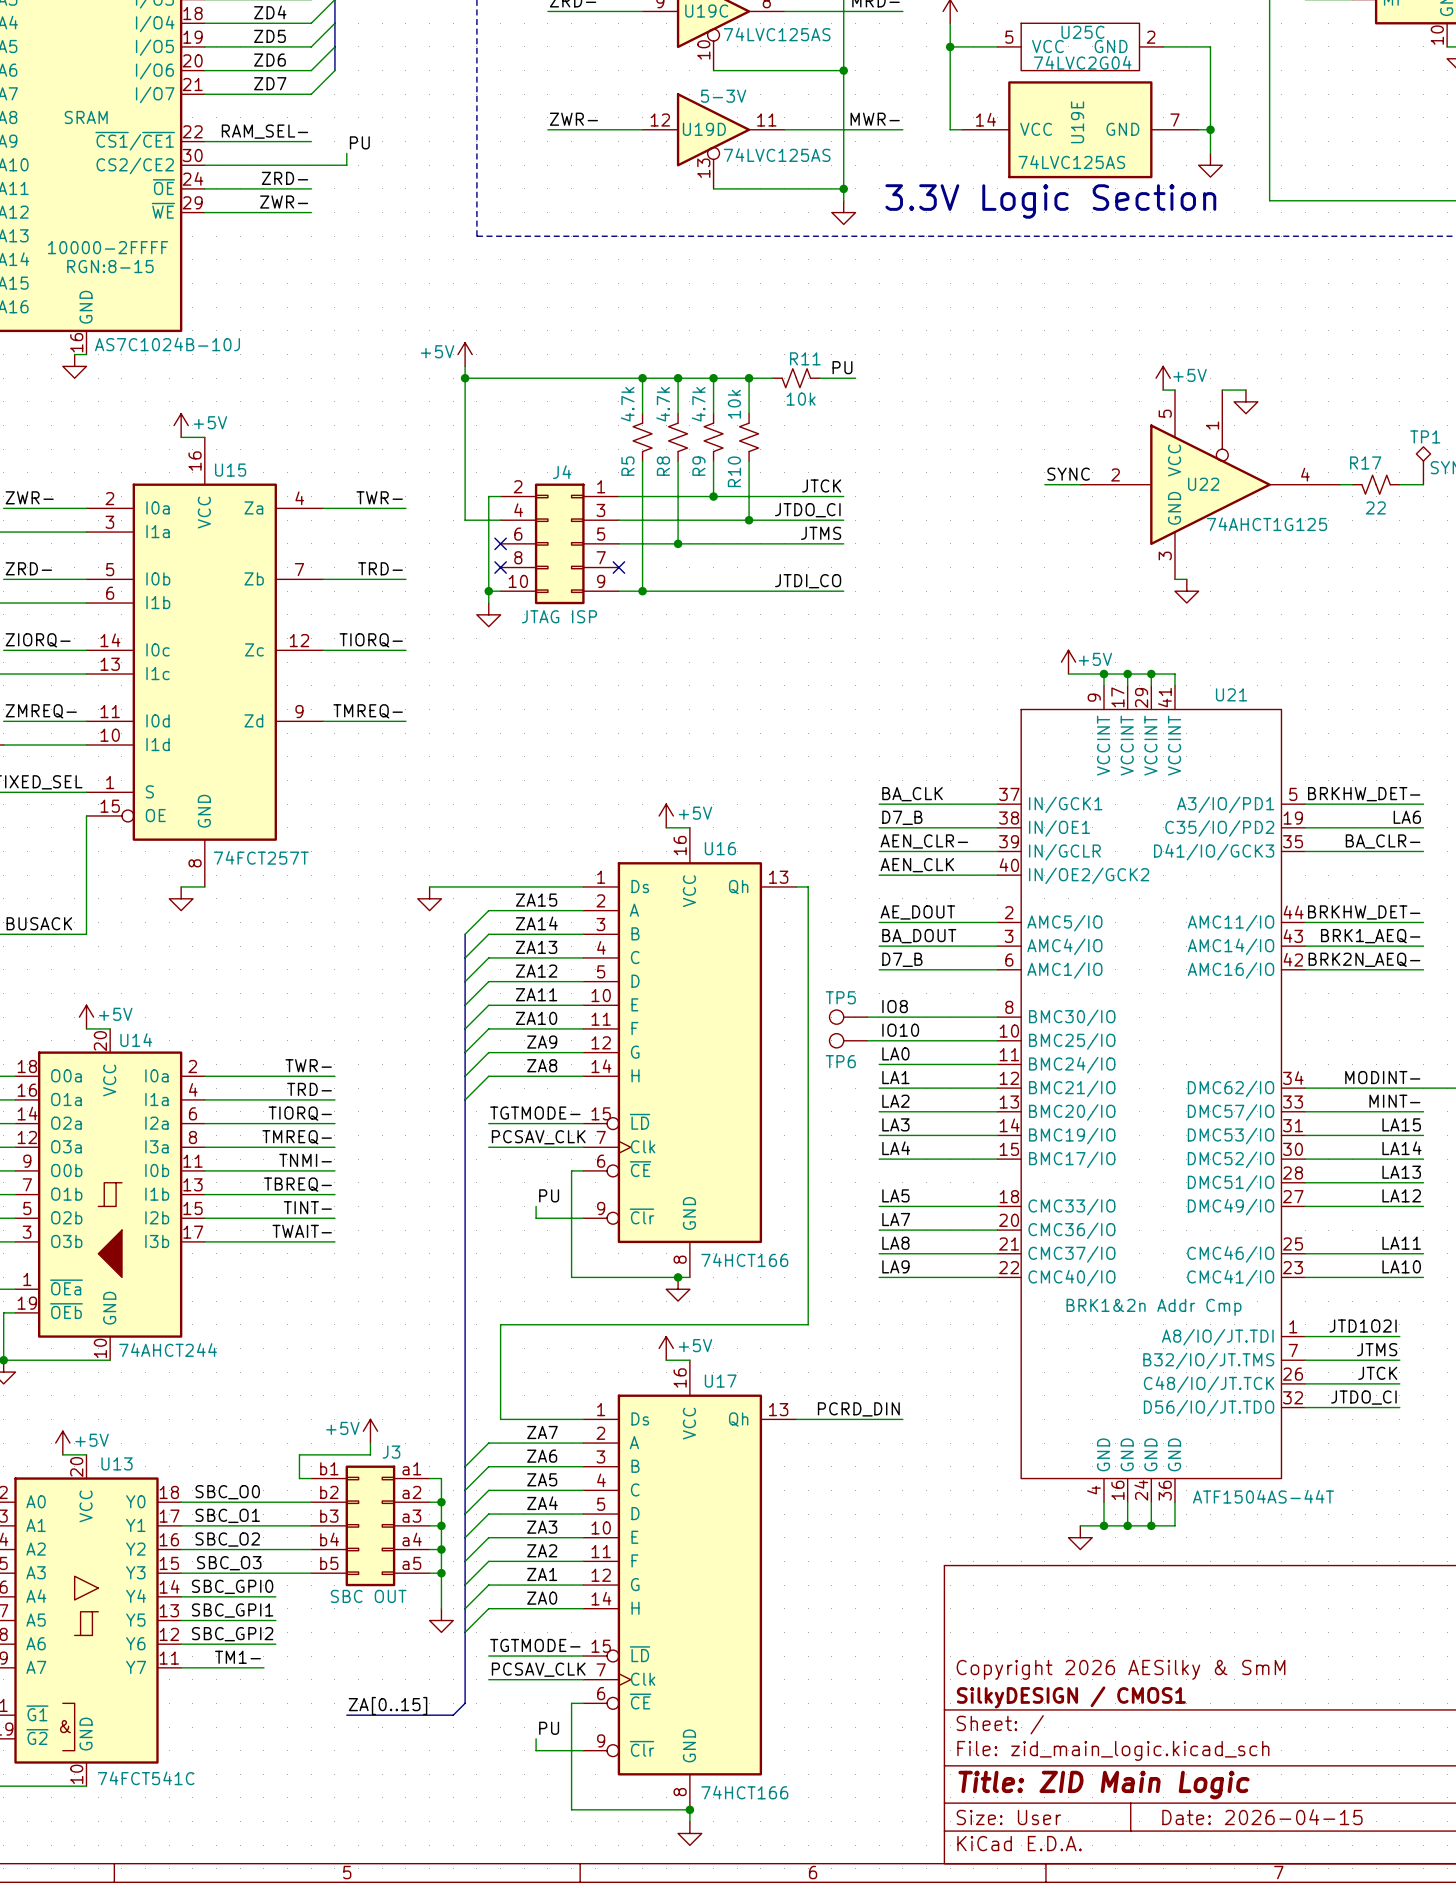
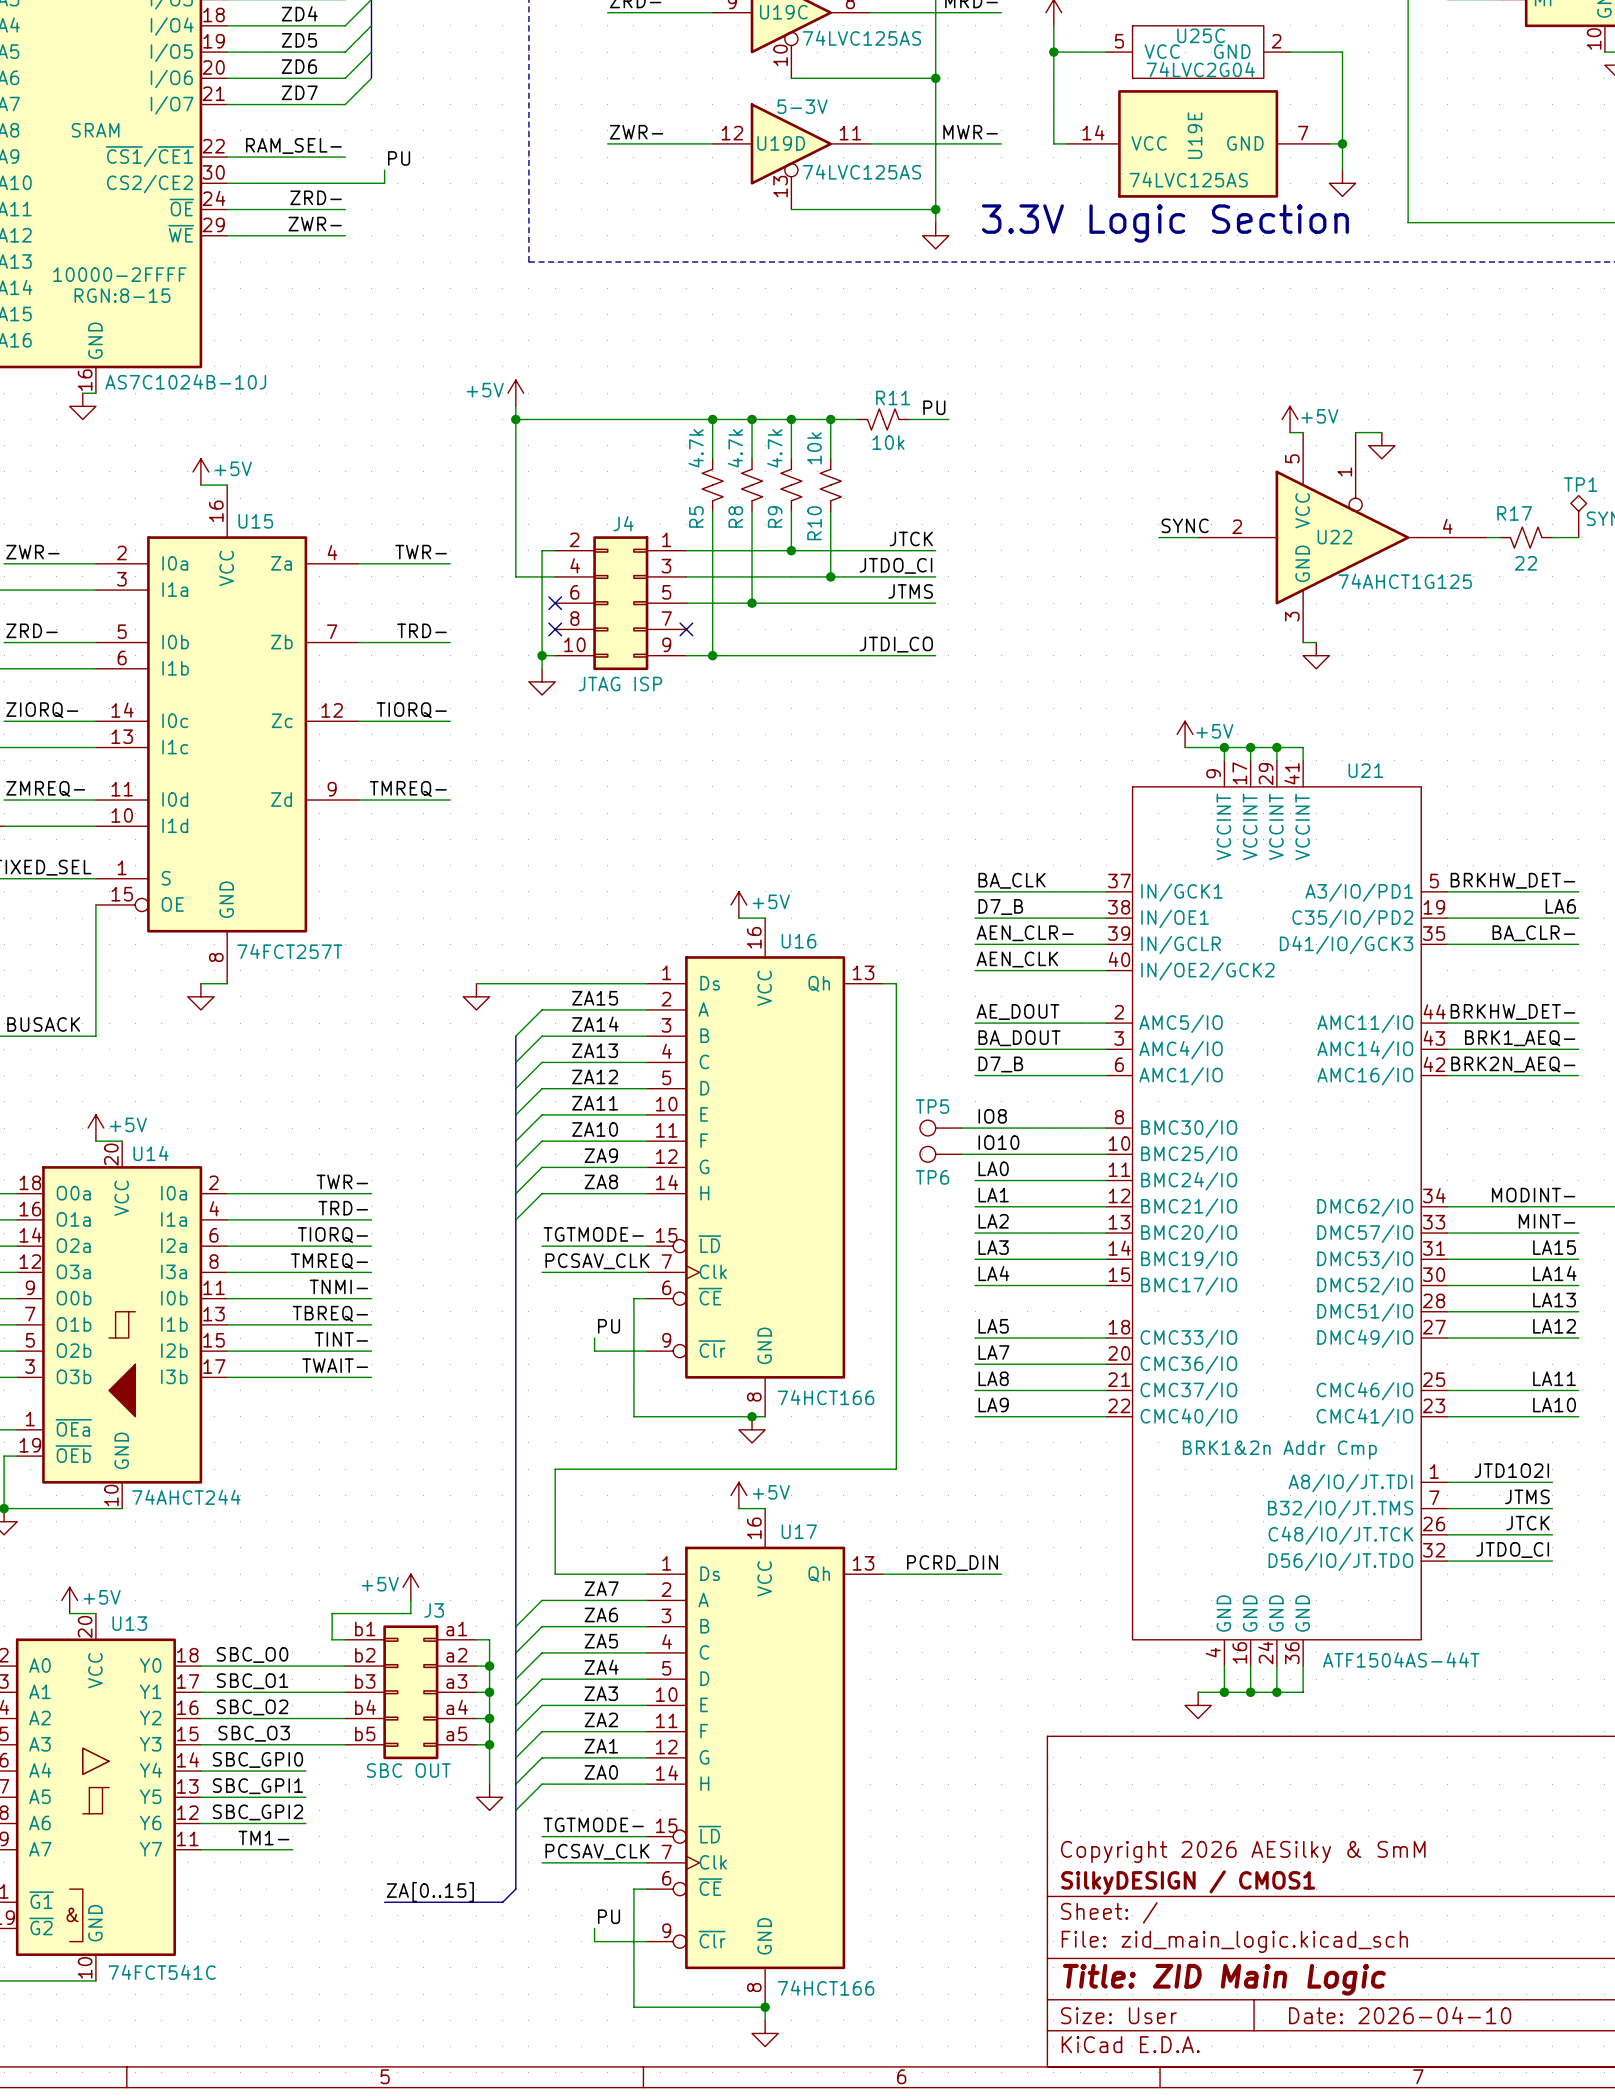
title block: Date: 2026-04-15 (1262, 1817) -> Date: 2026-04-10 (1400, 2015)

